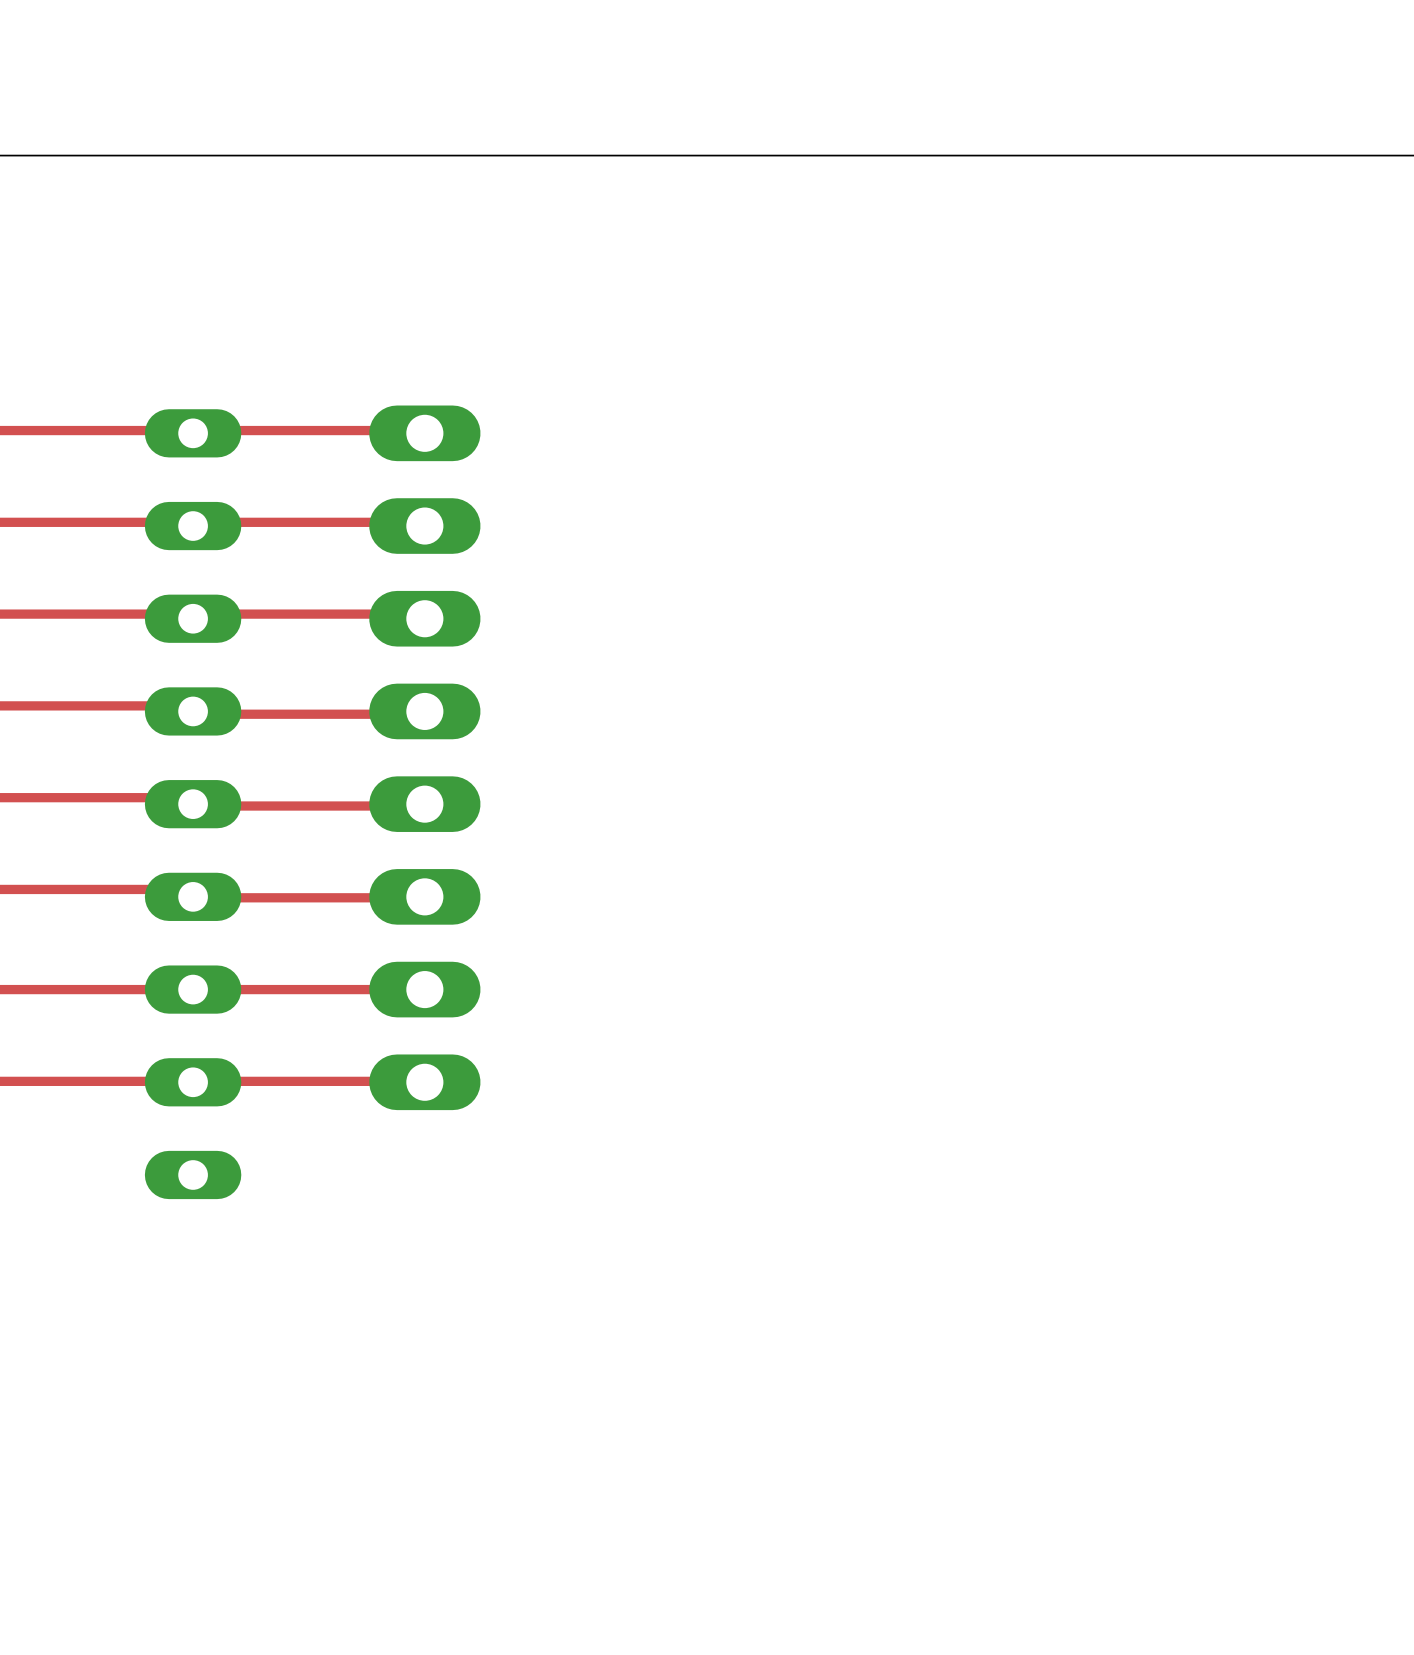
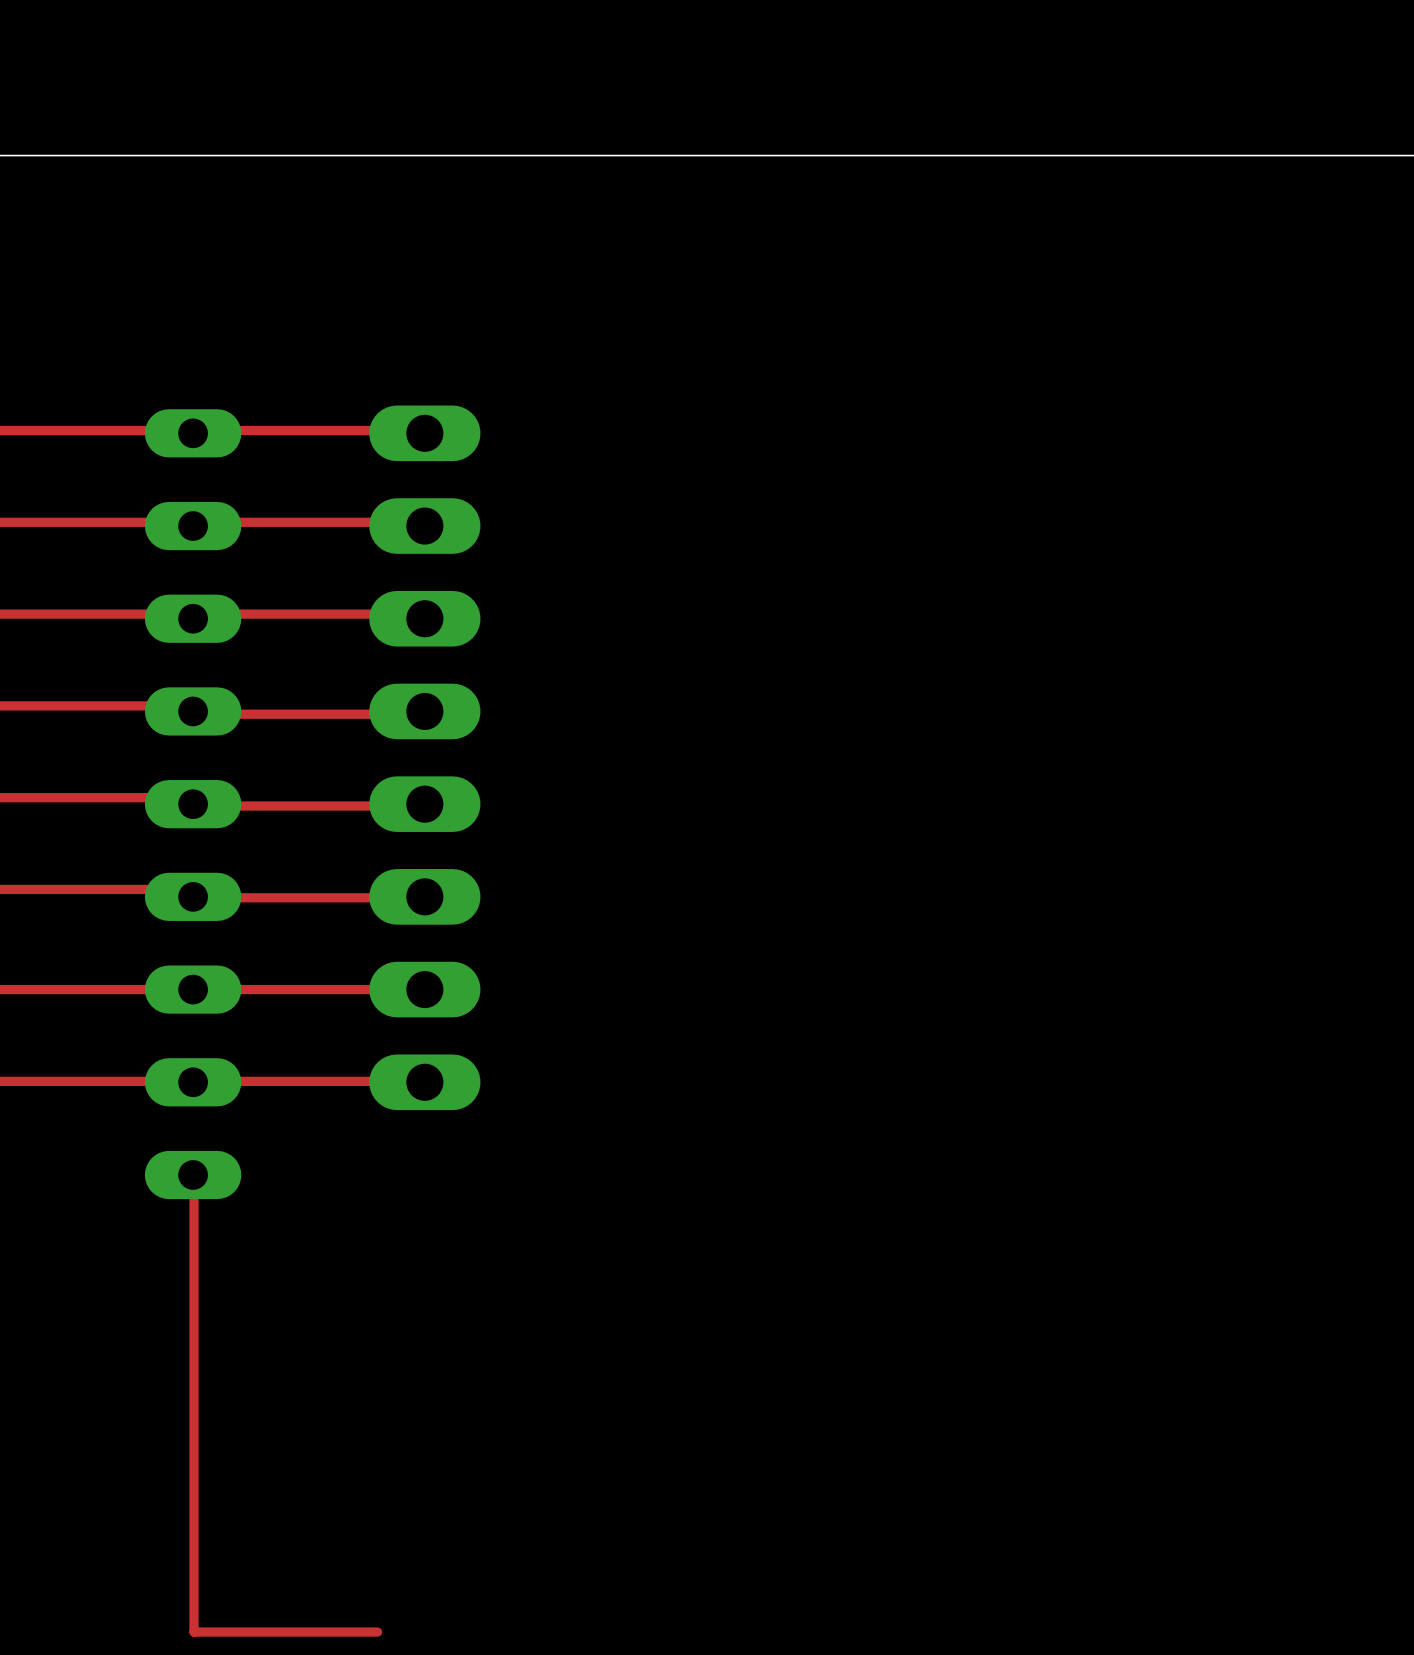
top track: none -> (193, 1174) (194, 1632) (377, 1632)

